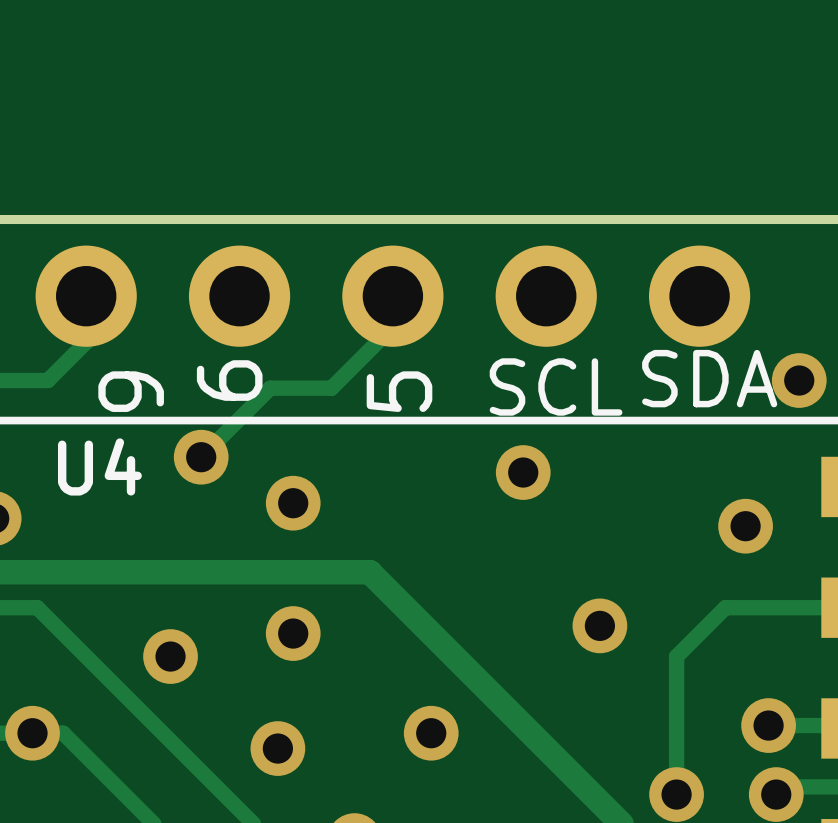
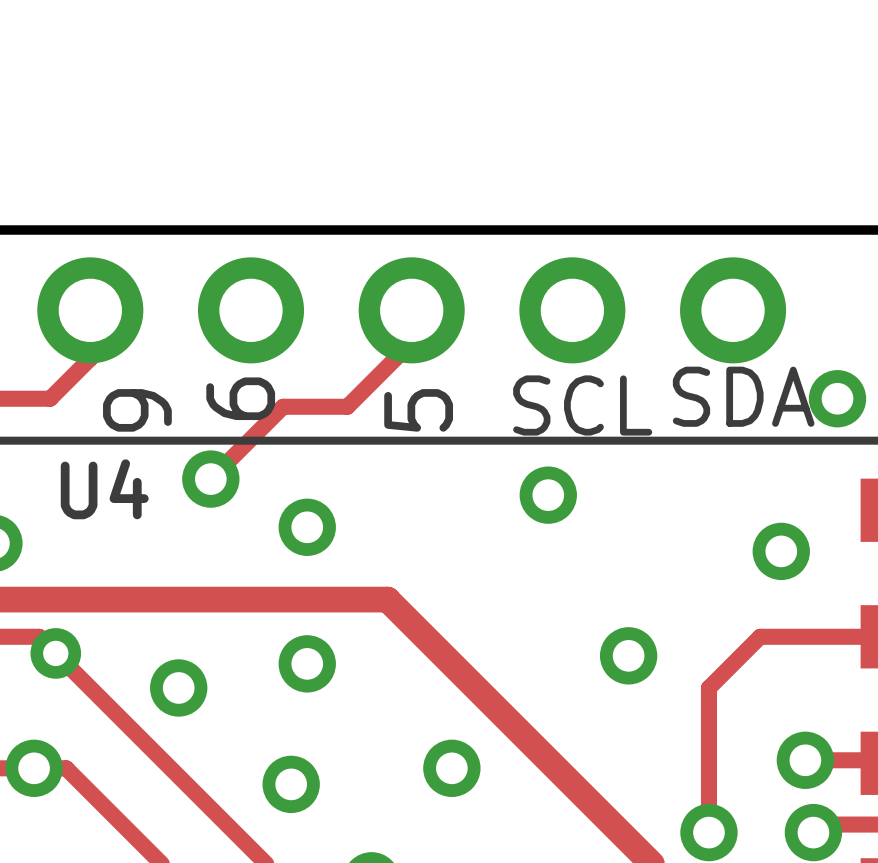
via: none -> (55, 653)

